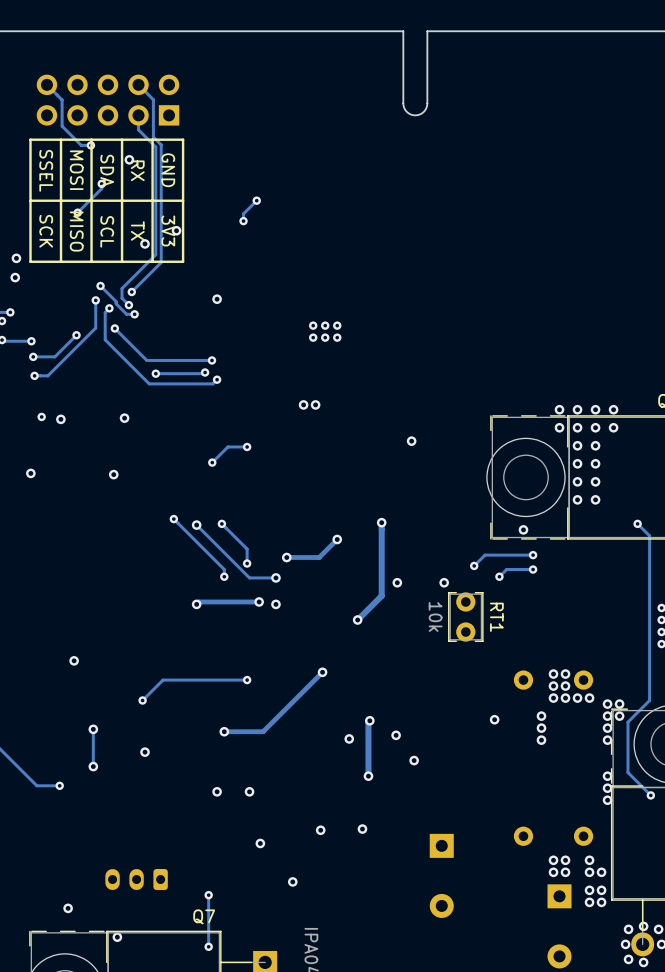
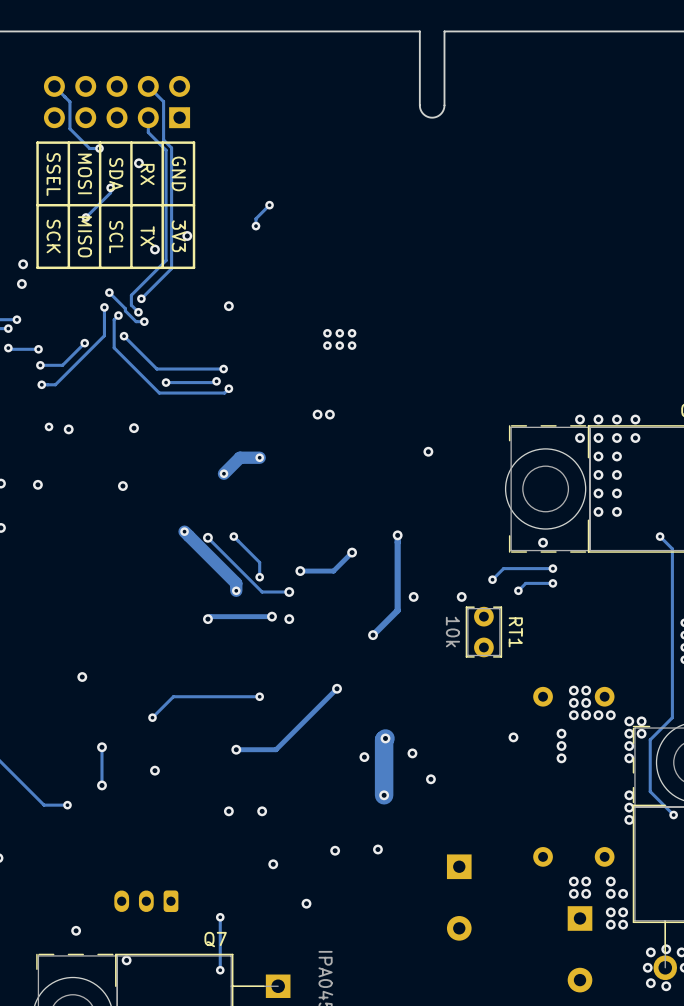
track width: thin (247, 446) (227, 446) (212, 462) -> thick (259, 457) (239, 457) (223, 473)
track width: thin (173, 519) (224, 569) (224, 576) -> thick (184, 531) (236, 583) (236, 590)
track width: thin (369, 720) (368, 776) -> thick (385, 738) (384, 795)

